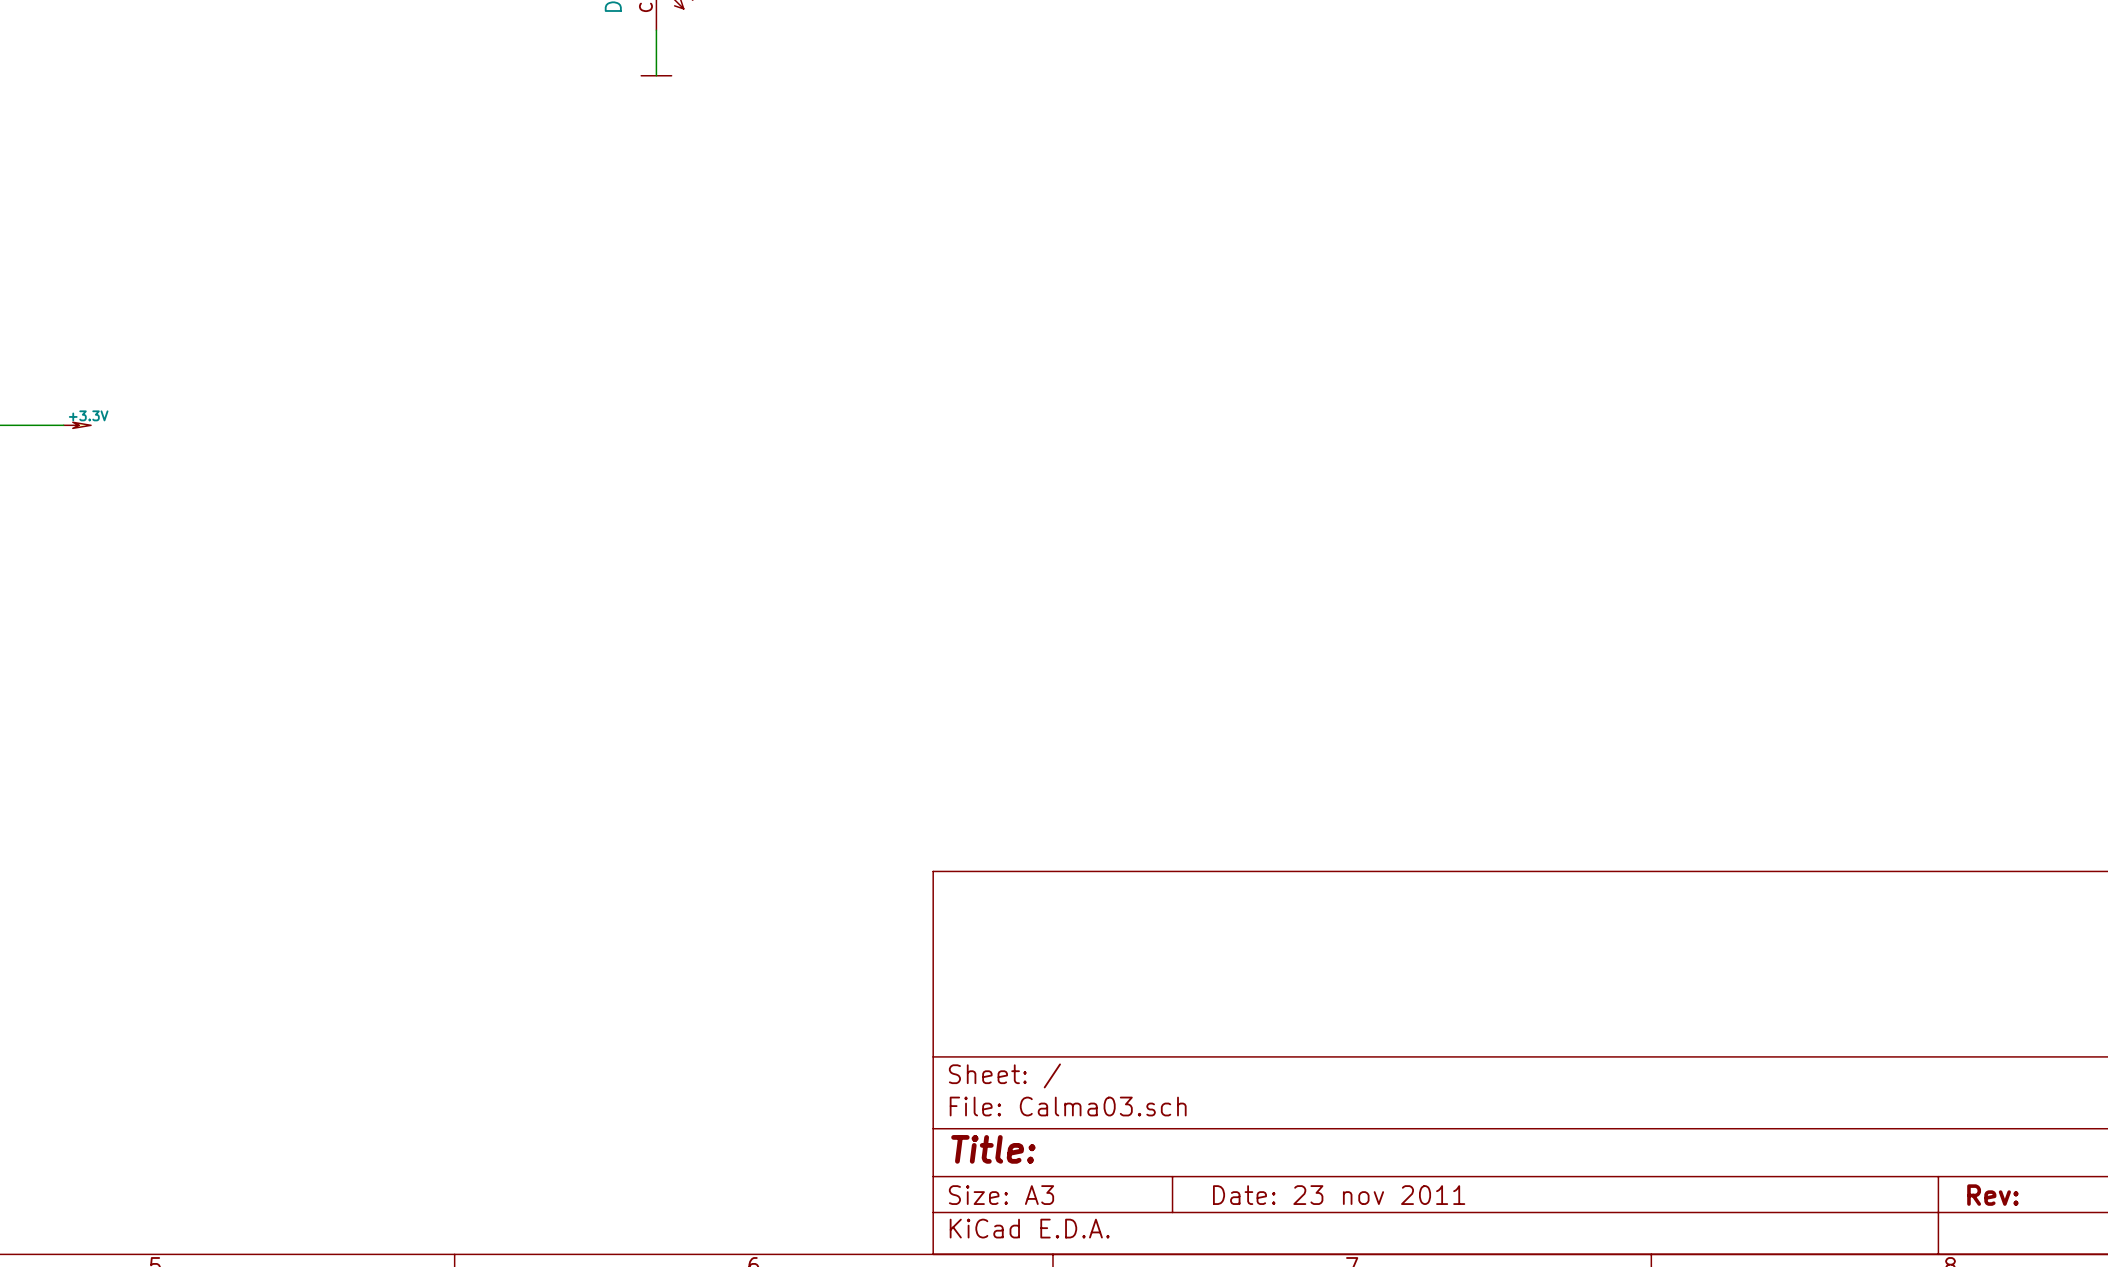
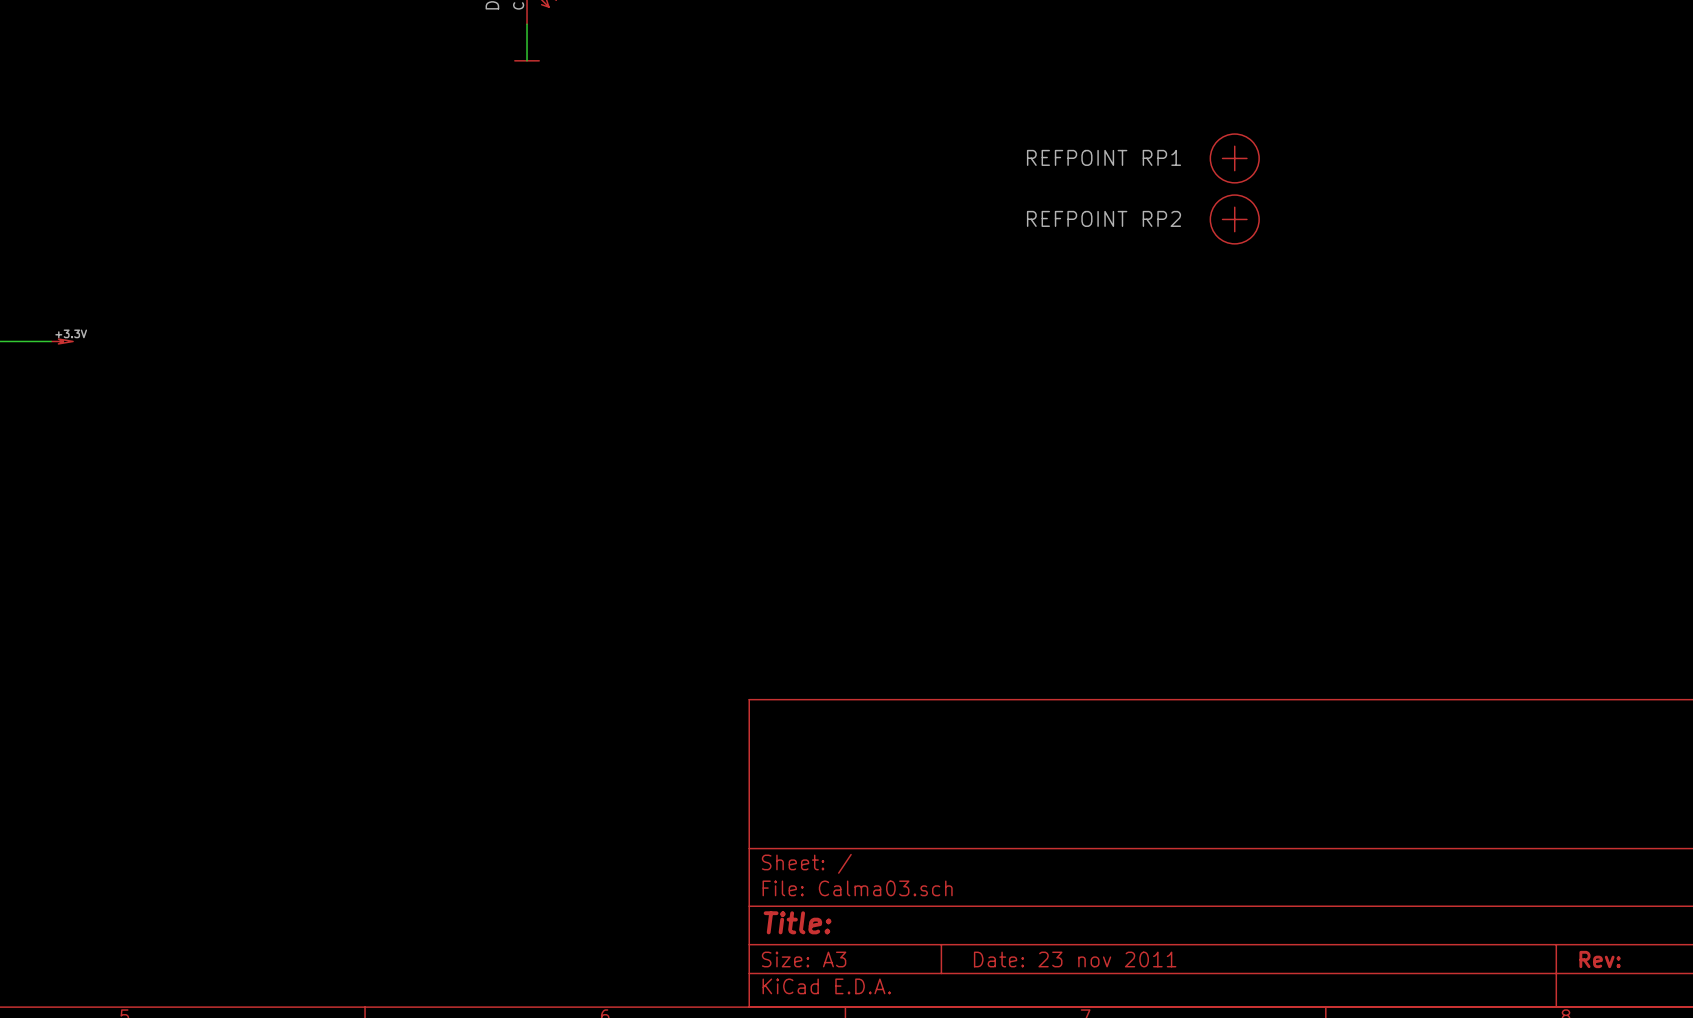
RP1: none -> REFPOINT (1234, 158)
RP2: none -> REFPOINT (1234, 219)

